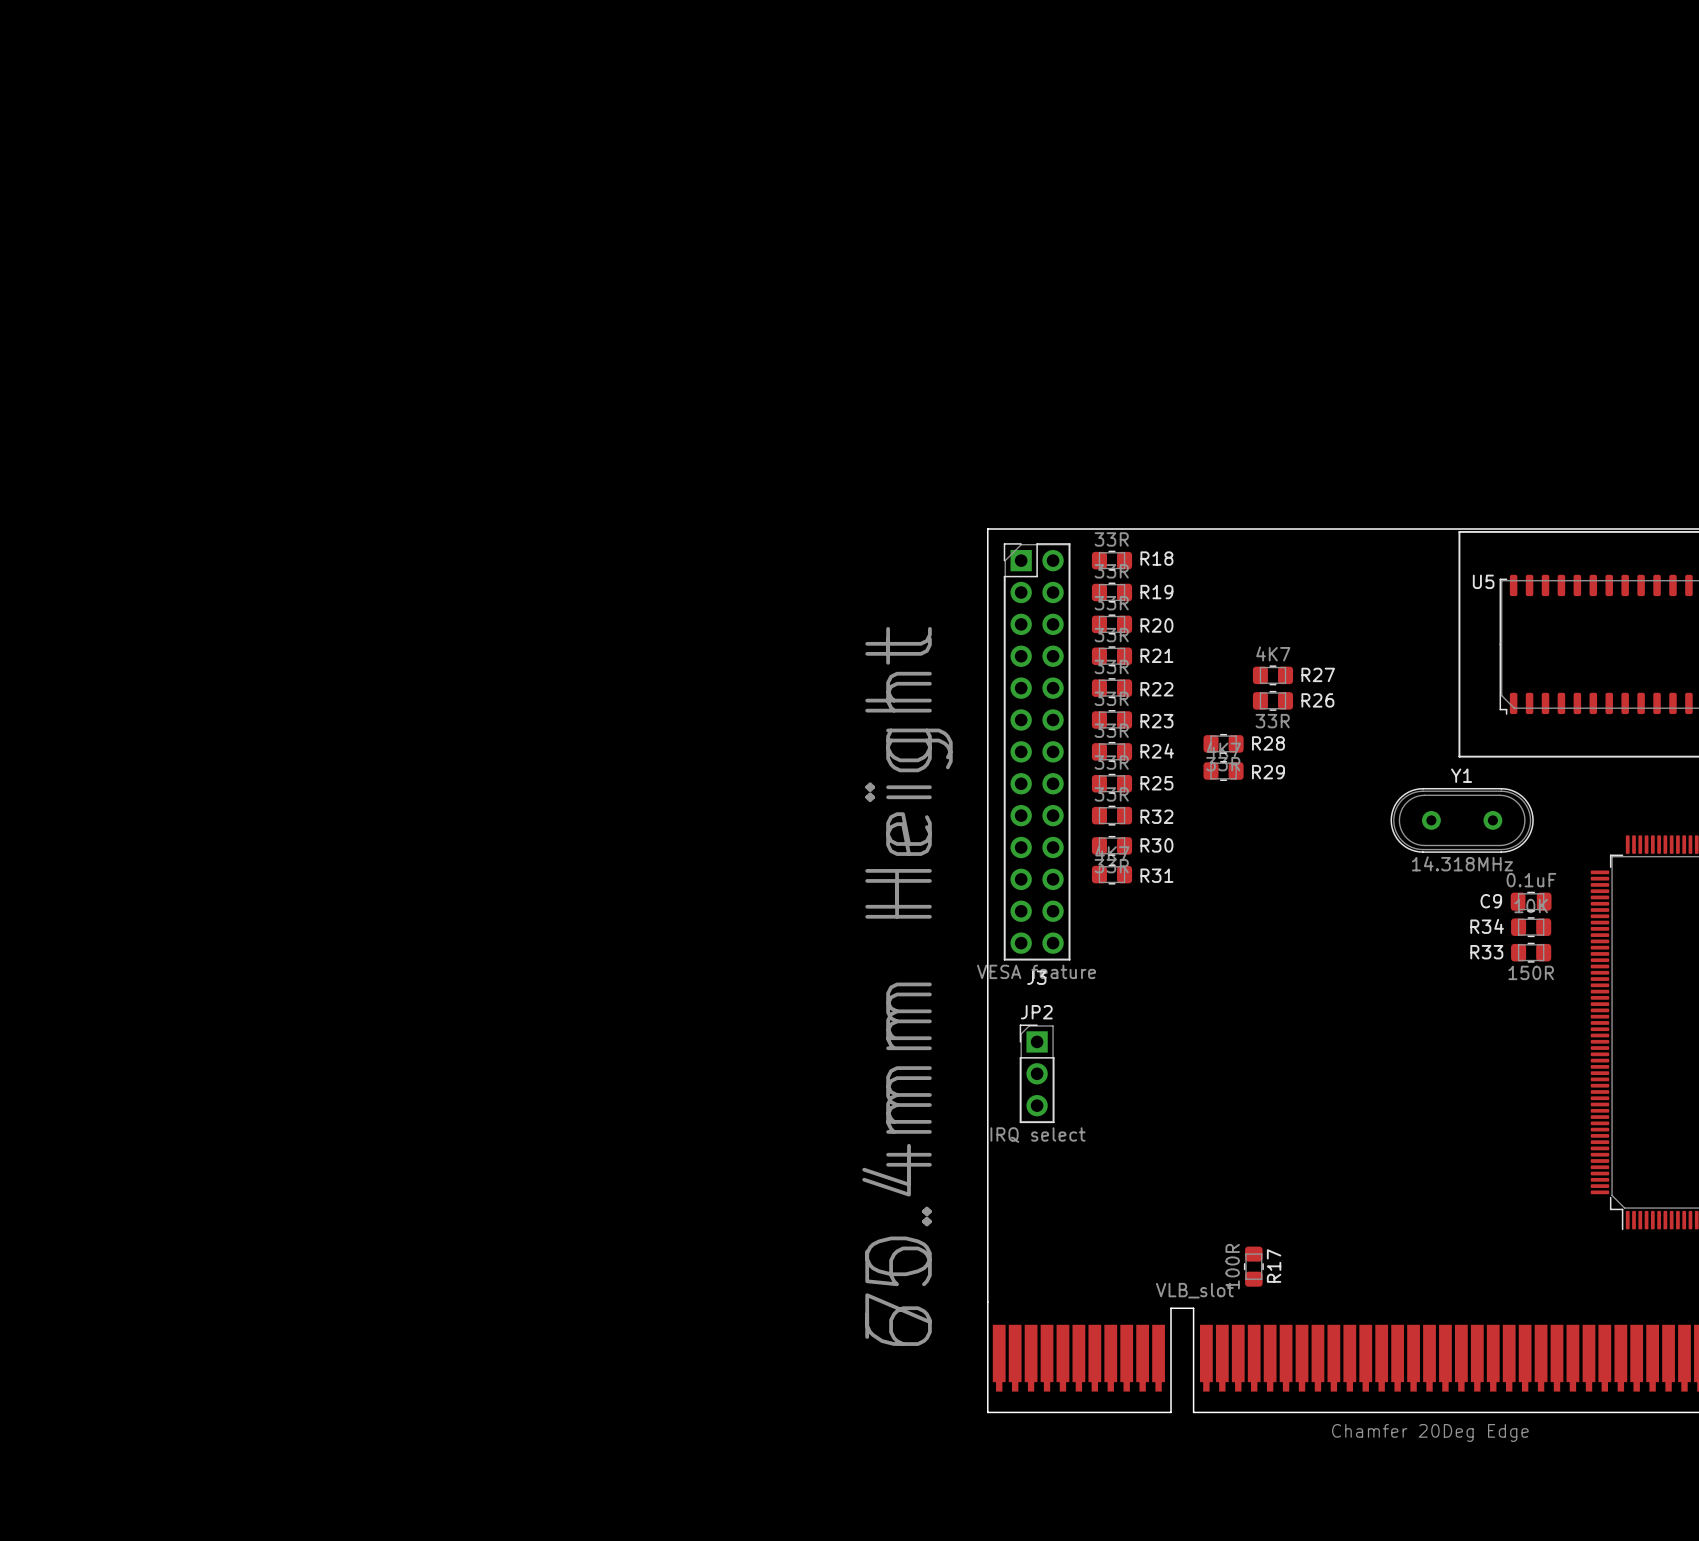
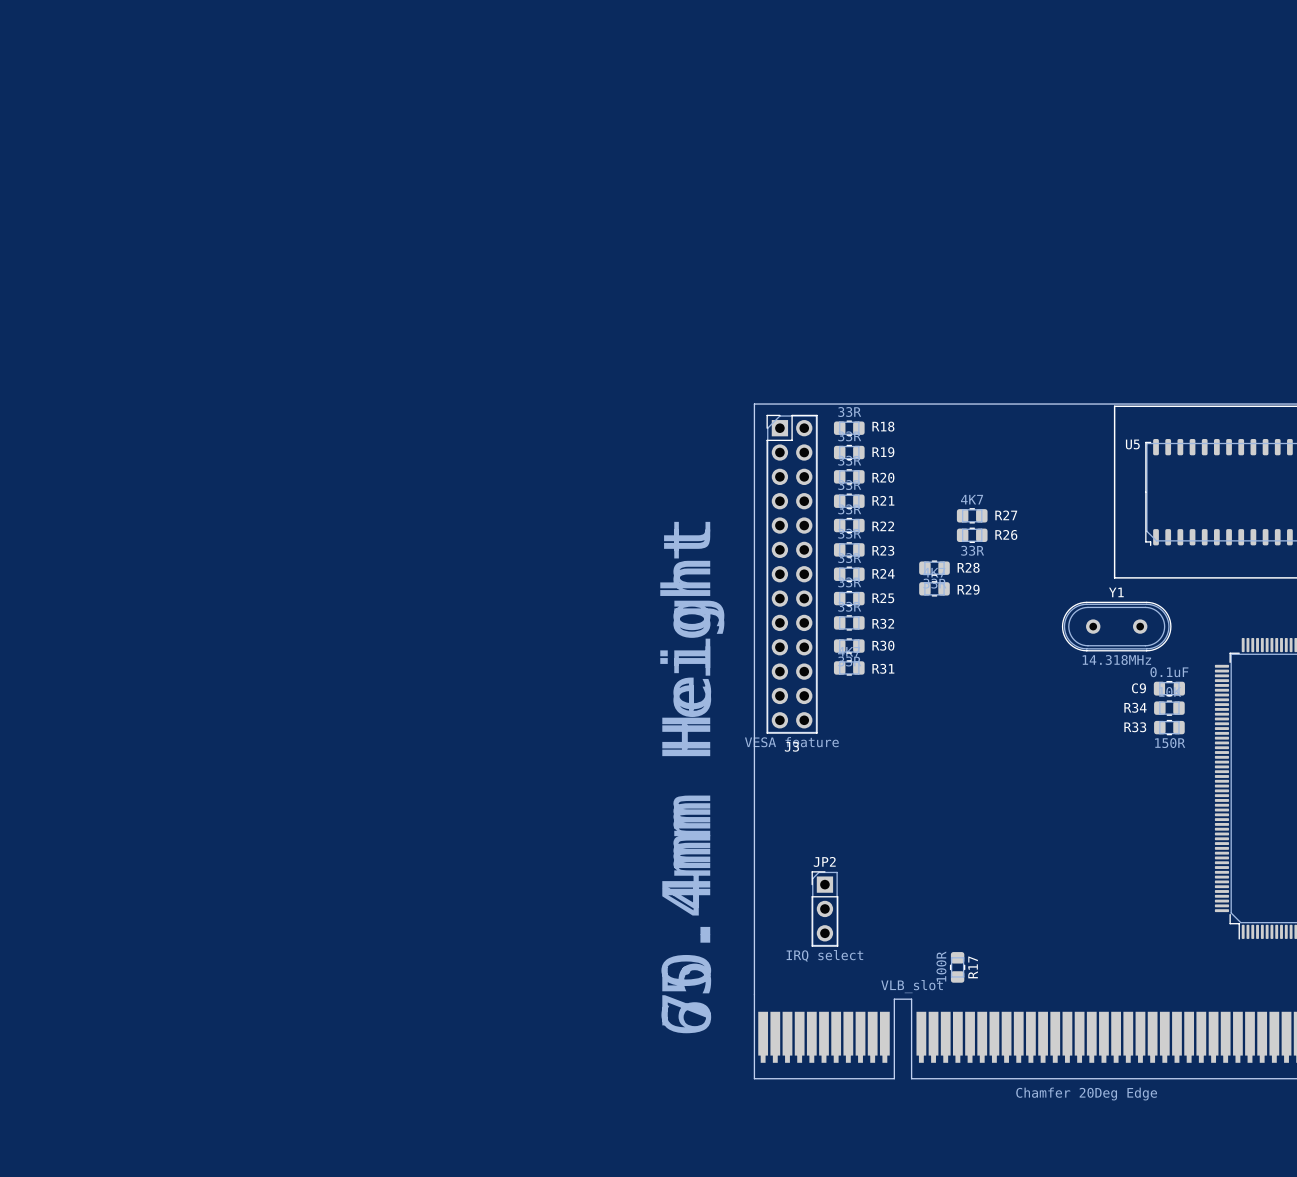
JP2 position: (1037, 1073) -> (824, 908)

